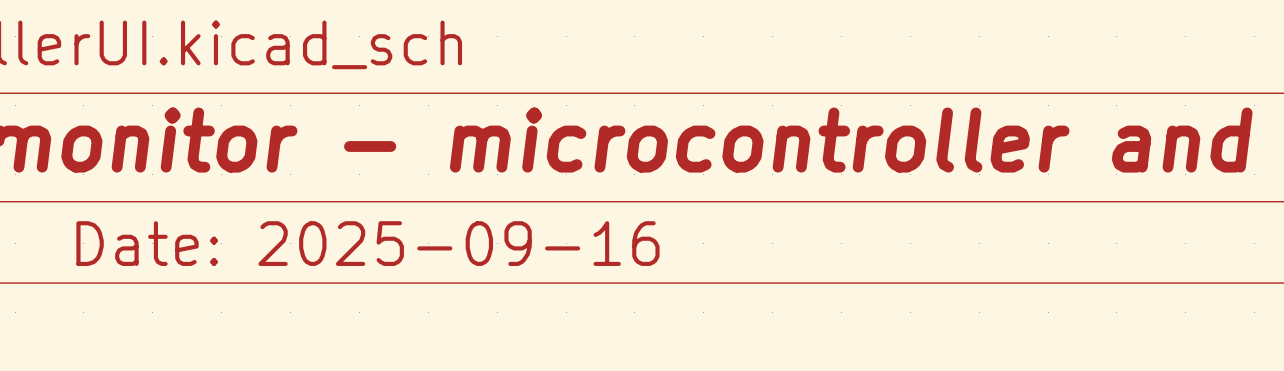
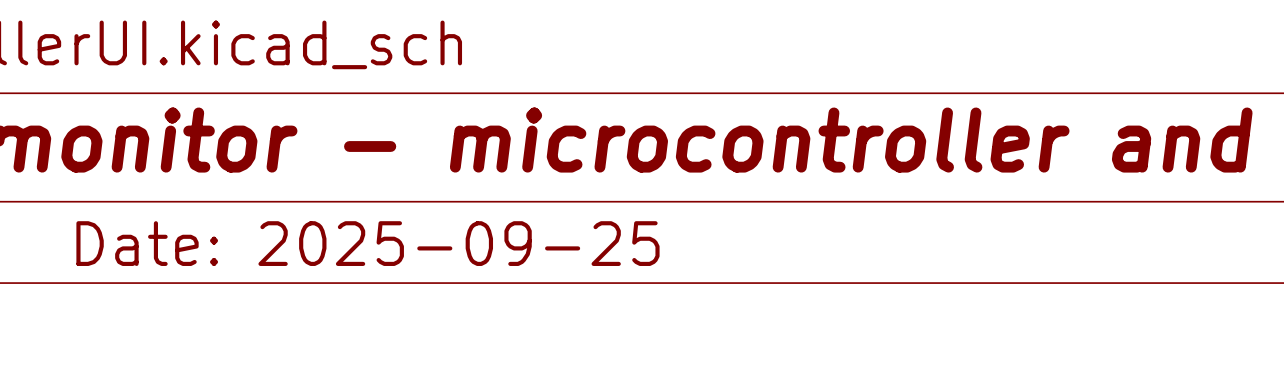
title block: Date: 2025-09-16 (367, 243) -> Date: 2025-09-25 (367, 243)

